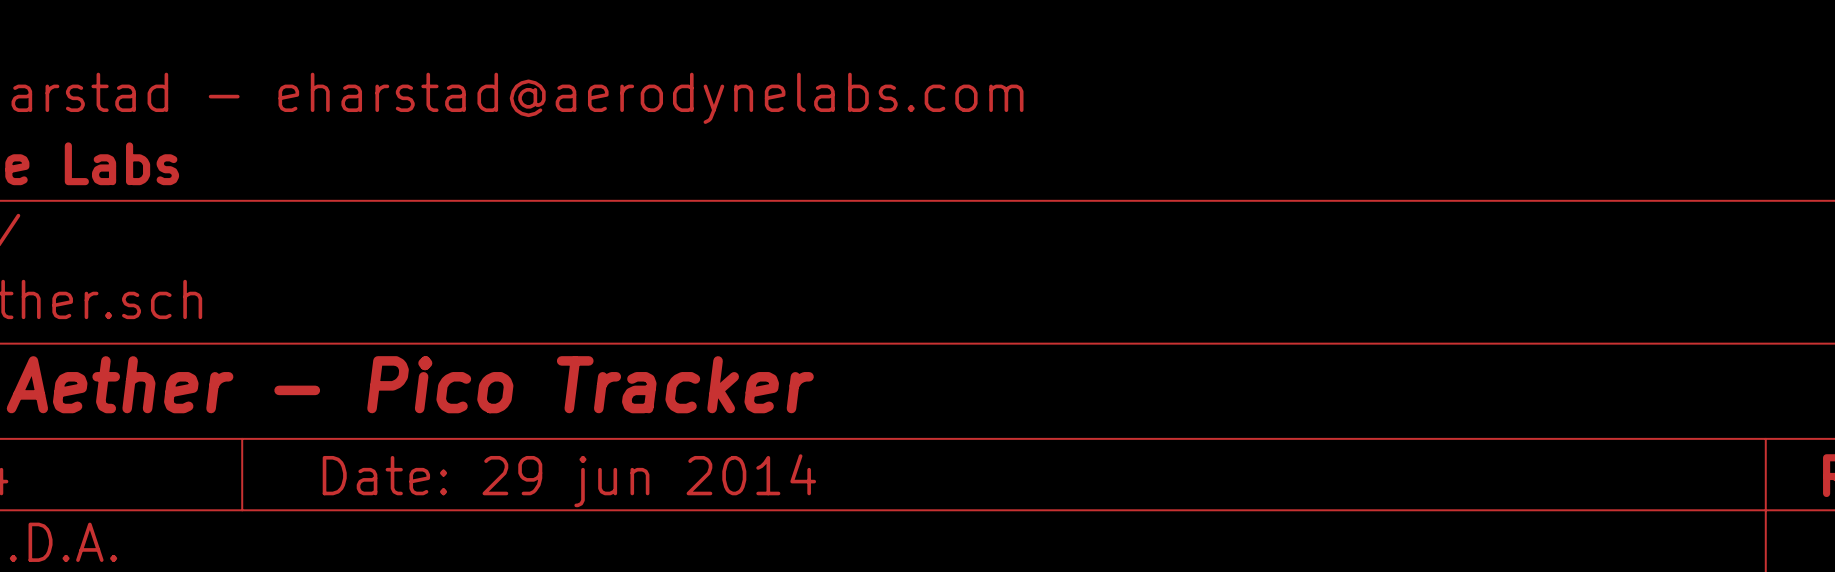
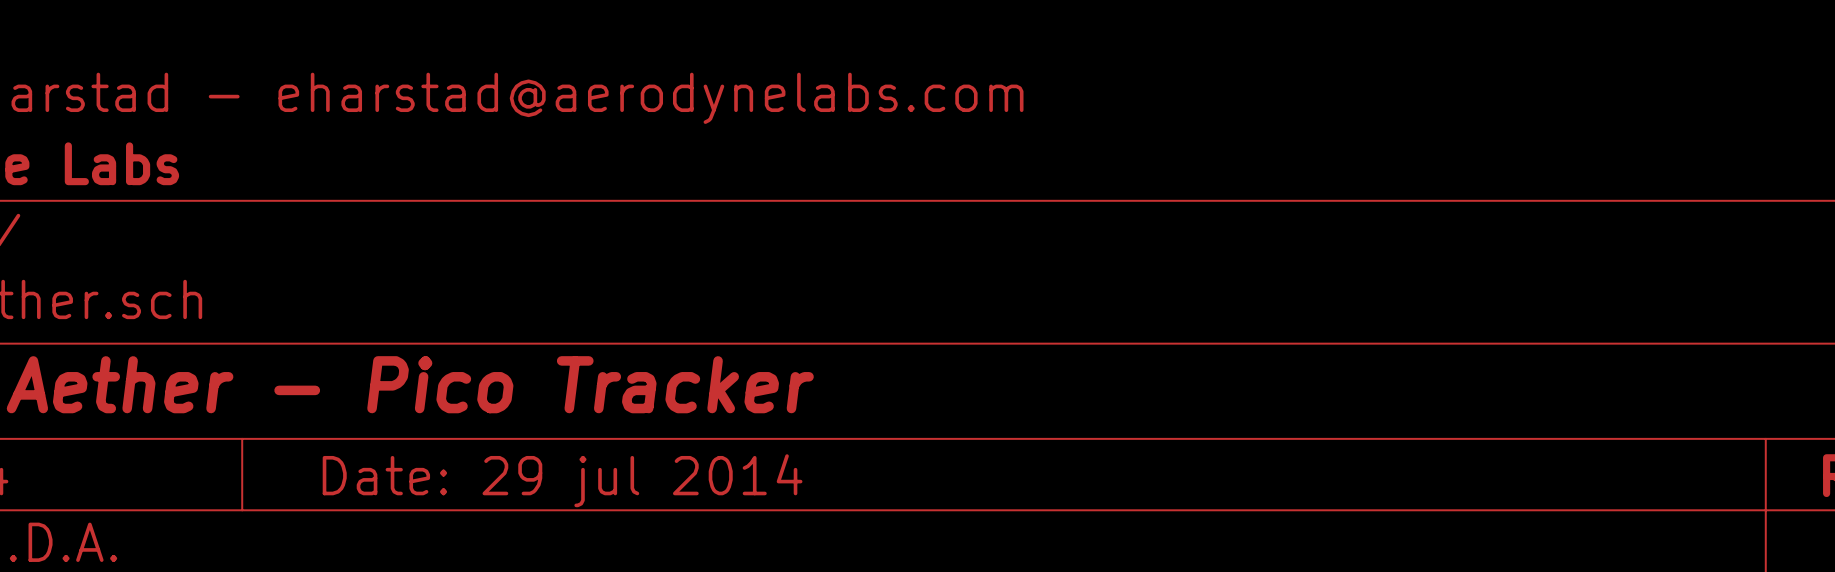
title block: Date: 29 jun 2014 (569, 480) -> Date: 29 jul 2014 (562, 480)

